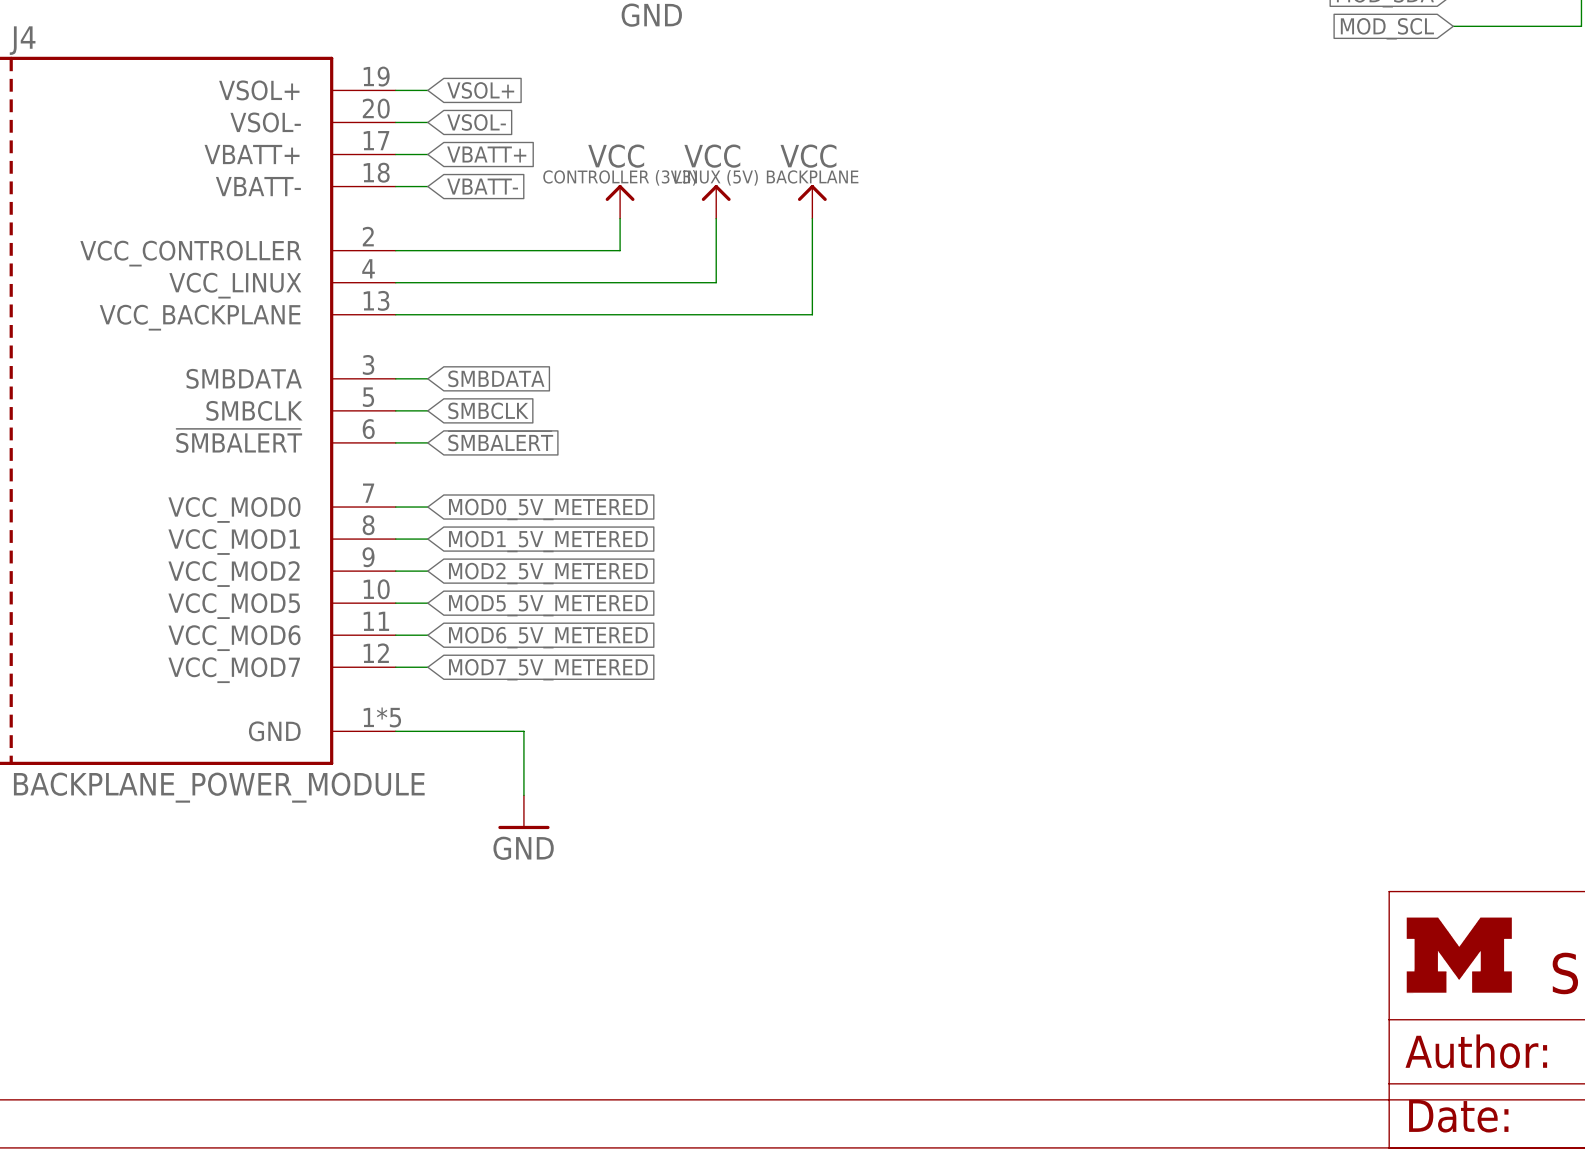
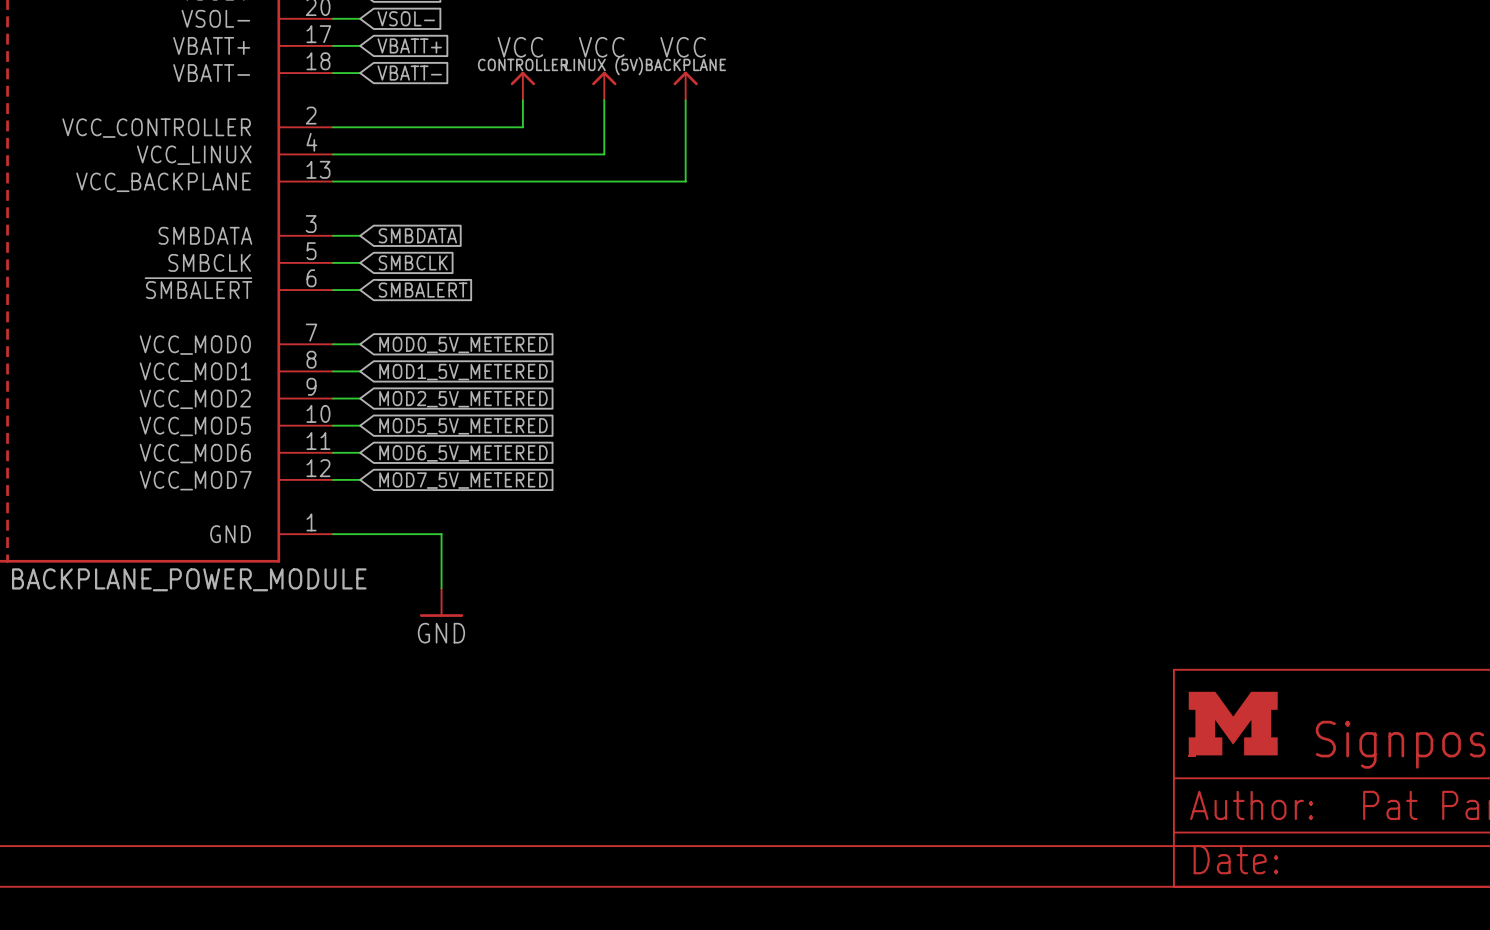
power symbol text: CONTROLLER (3V3) (619, 177) -> CONTROLLER (522, 64)
J4 pin number: 1*5 (382, 717) -> 1 (311, 522)

